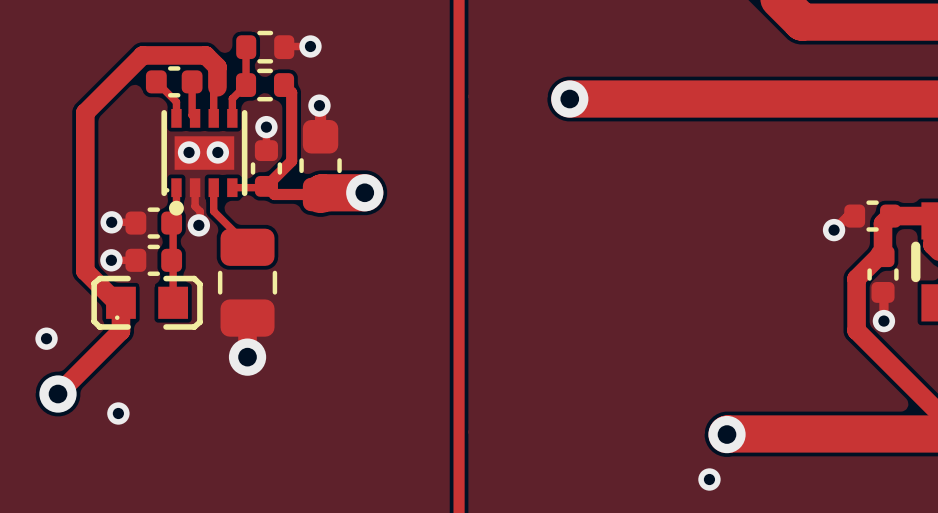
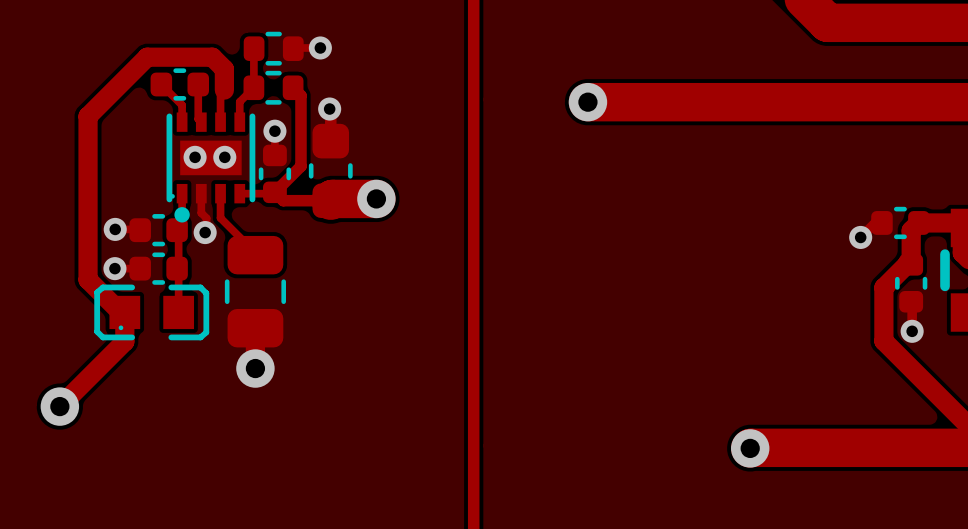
via: (46, 338) -> none
via: (118, 413) -> none
via: (709, 479) -> none

